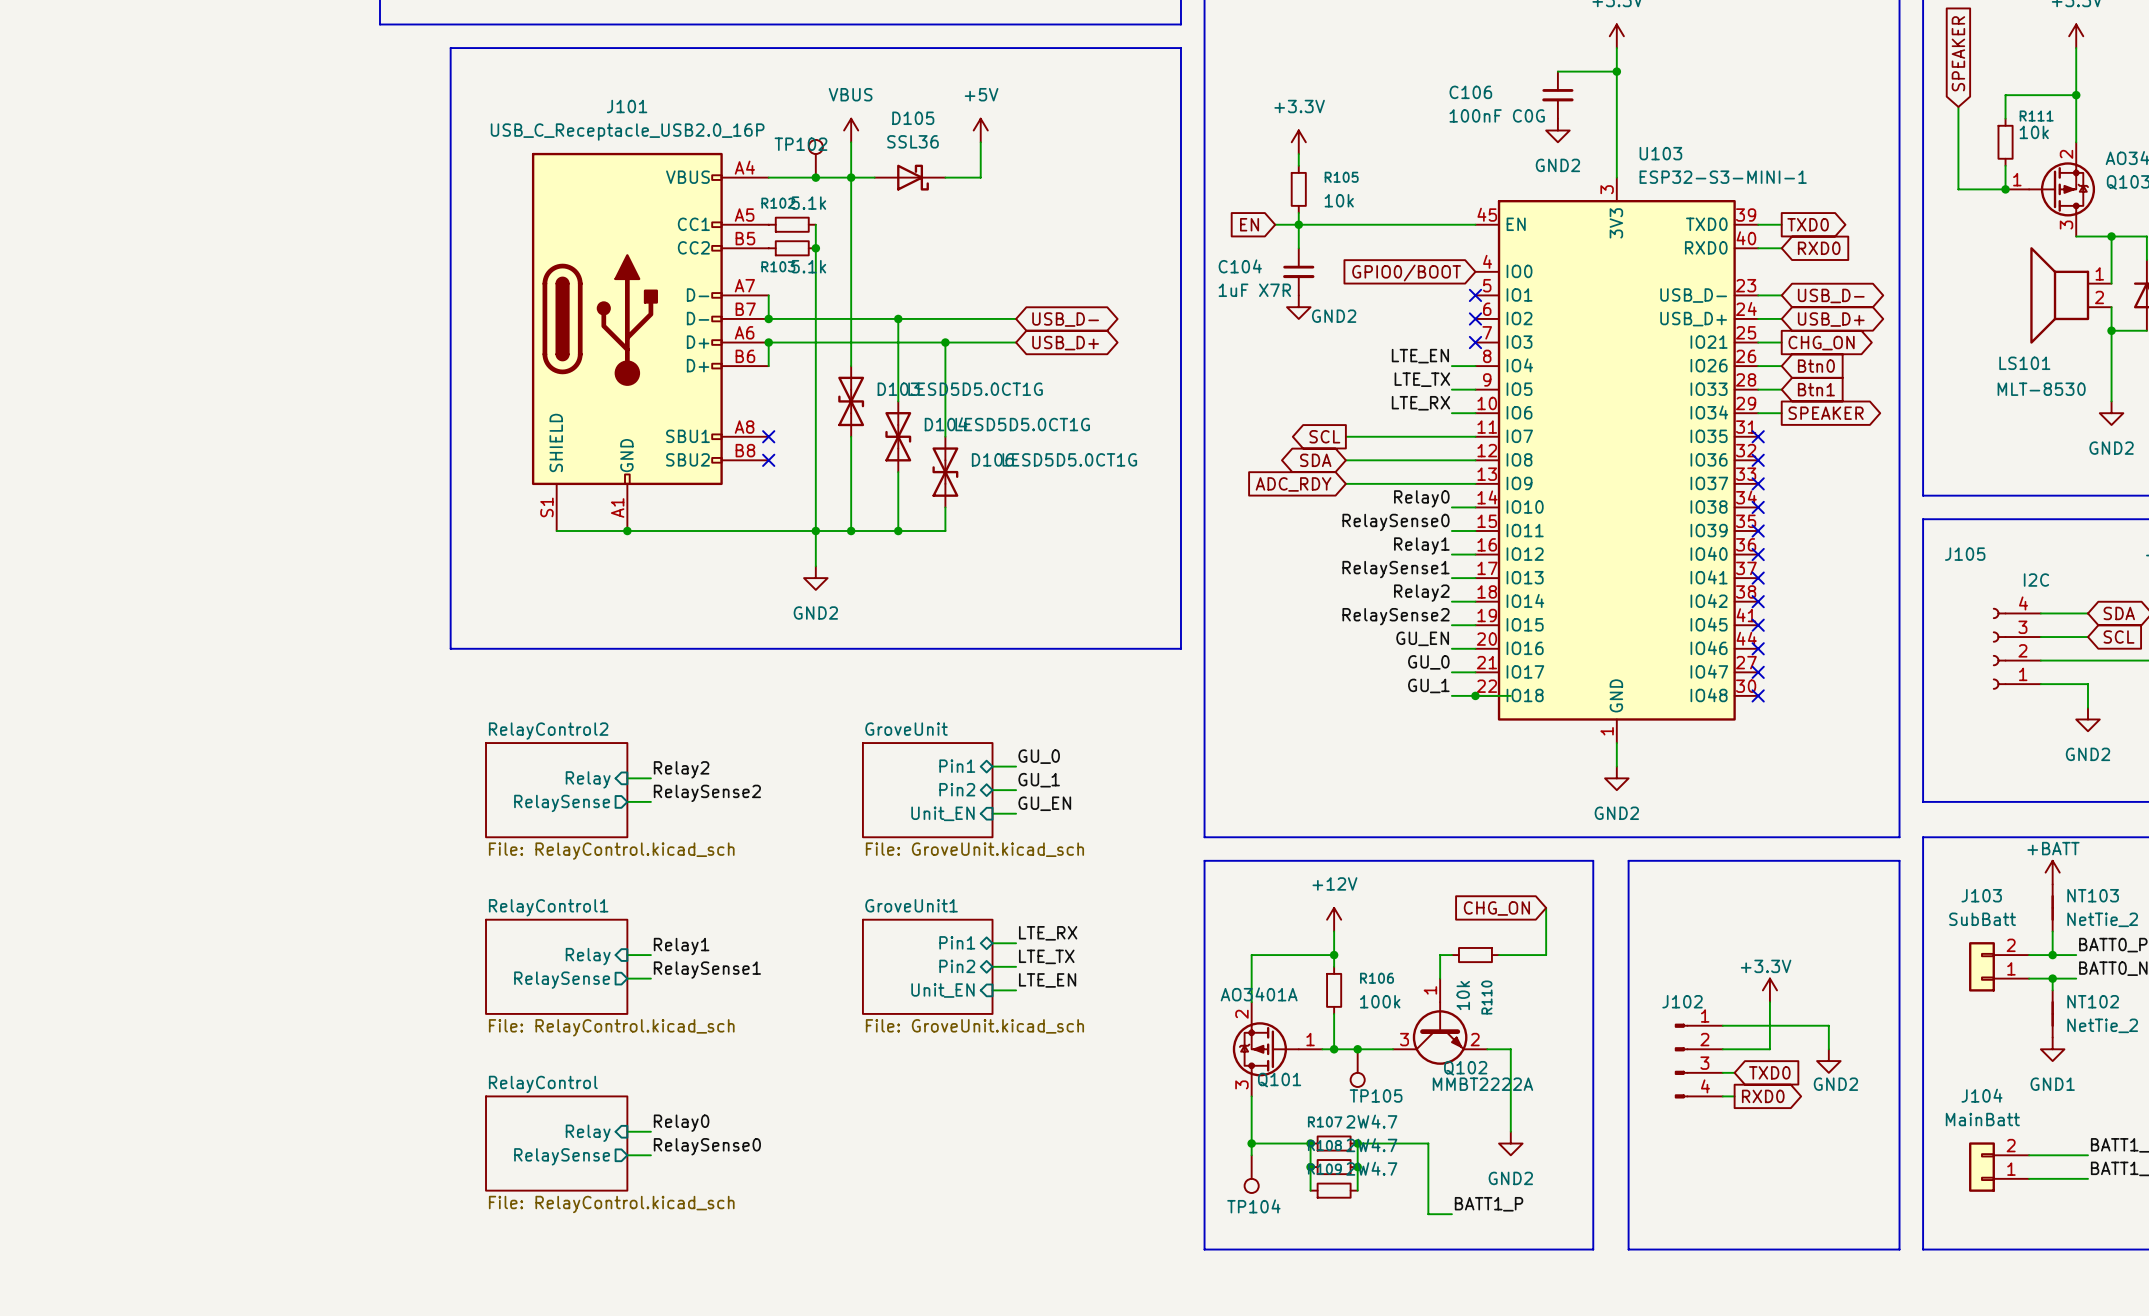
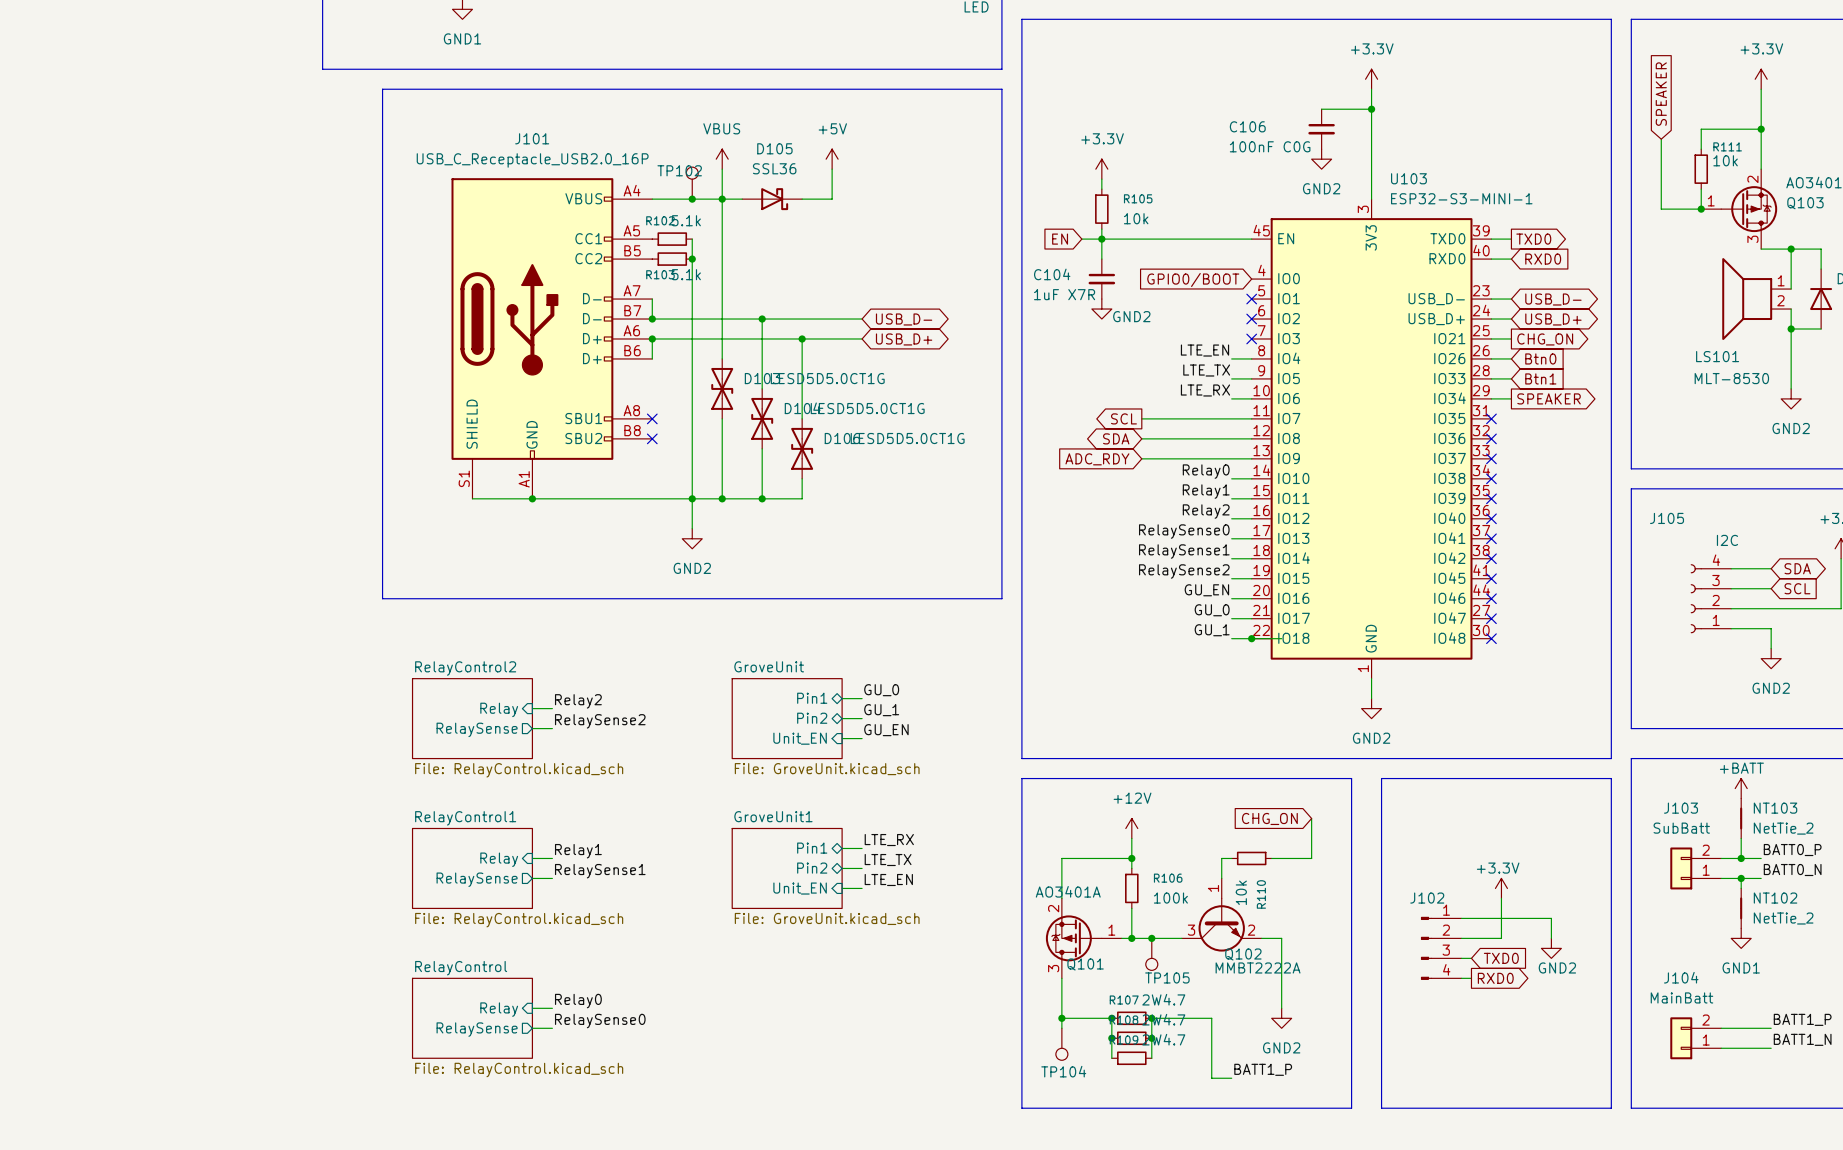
label: RelaySense0 (1396, 522) -> Relay1 (1206, 491)
label: Relay1 (1421, 546) -> Relay2 (1206, 511)
label: RelaySense1 (1396, 569) -> RelaySense0 (1184, 531)
label: Relay2 (1421, 593) -> RelaySense1 (1184, 551)

